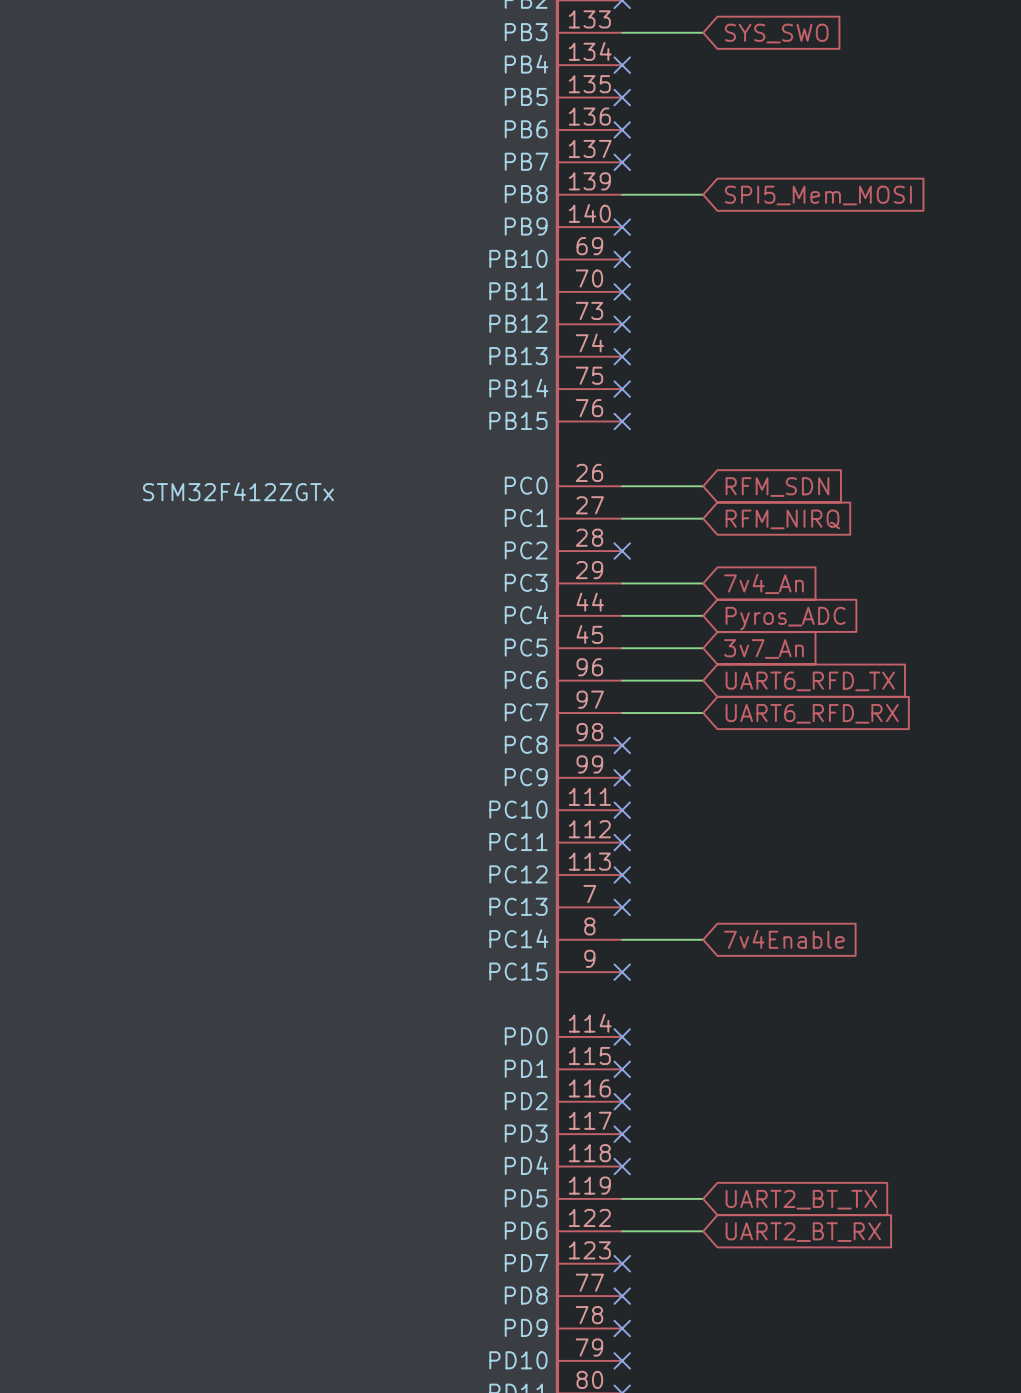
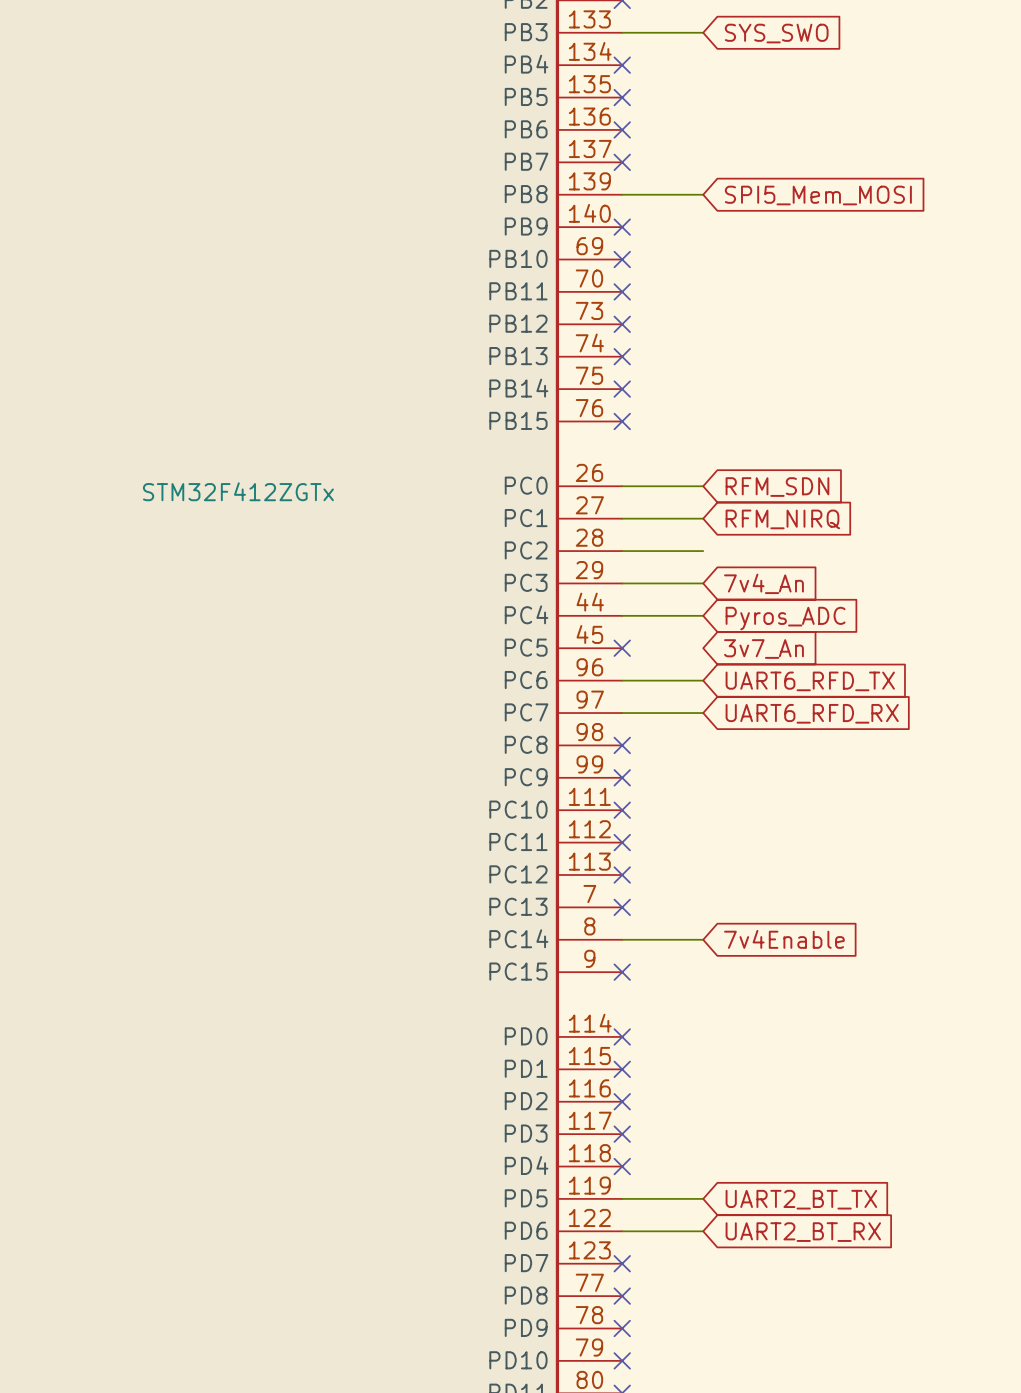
no-connect mark: (622, 551) -> none
wire: (622, 648) (703, 648) -> (622, 551) (703, 551)
no-connect mark: none -> (622, 648)

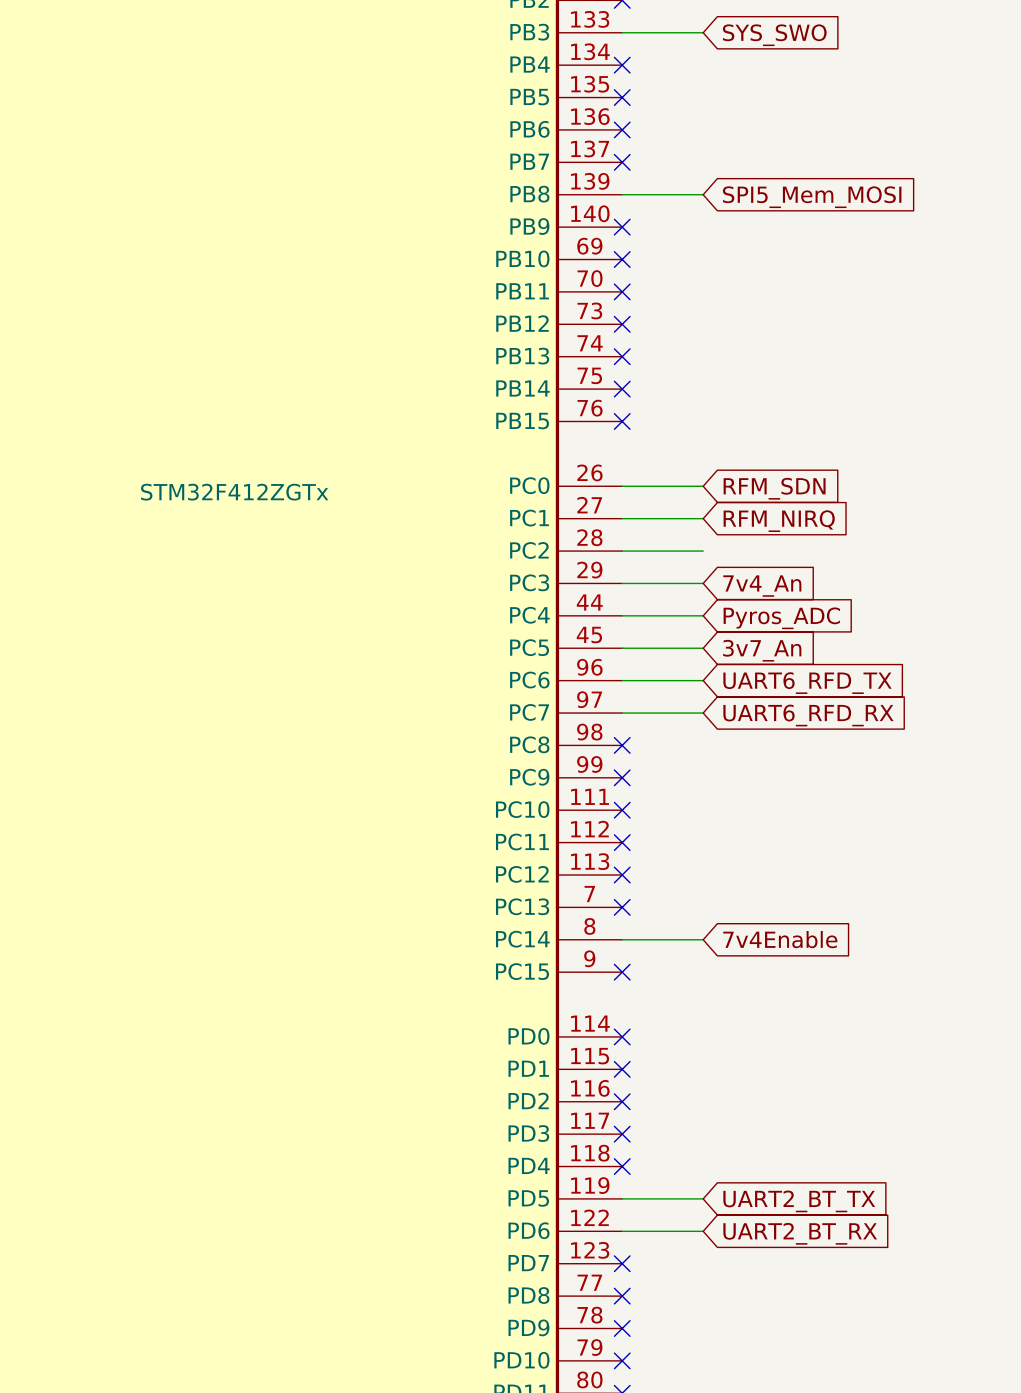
wire: none -> (622, 648) (703, 648)
no-connect mark: (622, 648) -> none

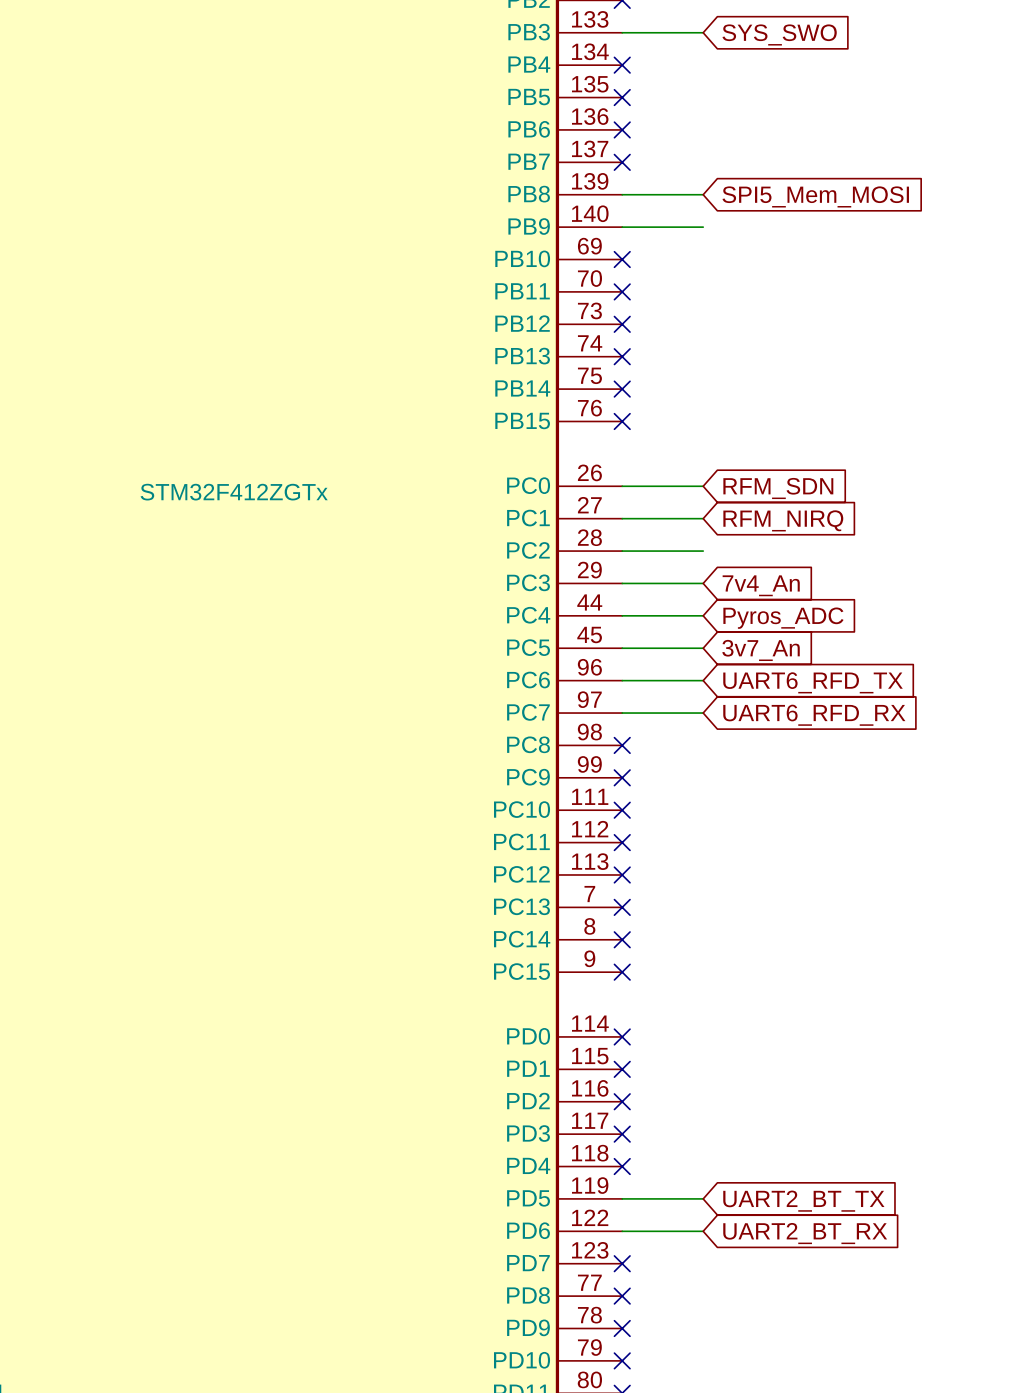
wire: none -> (622, 227) (703, 227)
no-connect mark: (622, 227) -> none
wire: (622, 939) (703, 939) -> none
no-connect mark: none -> (622, 939)
global label: 7v4Enable (780, 939) -> none

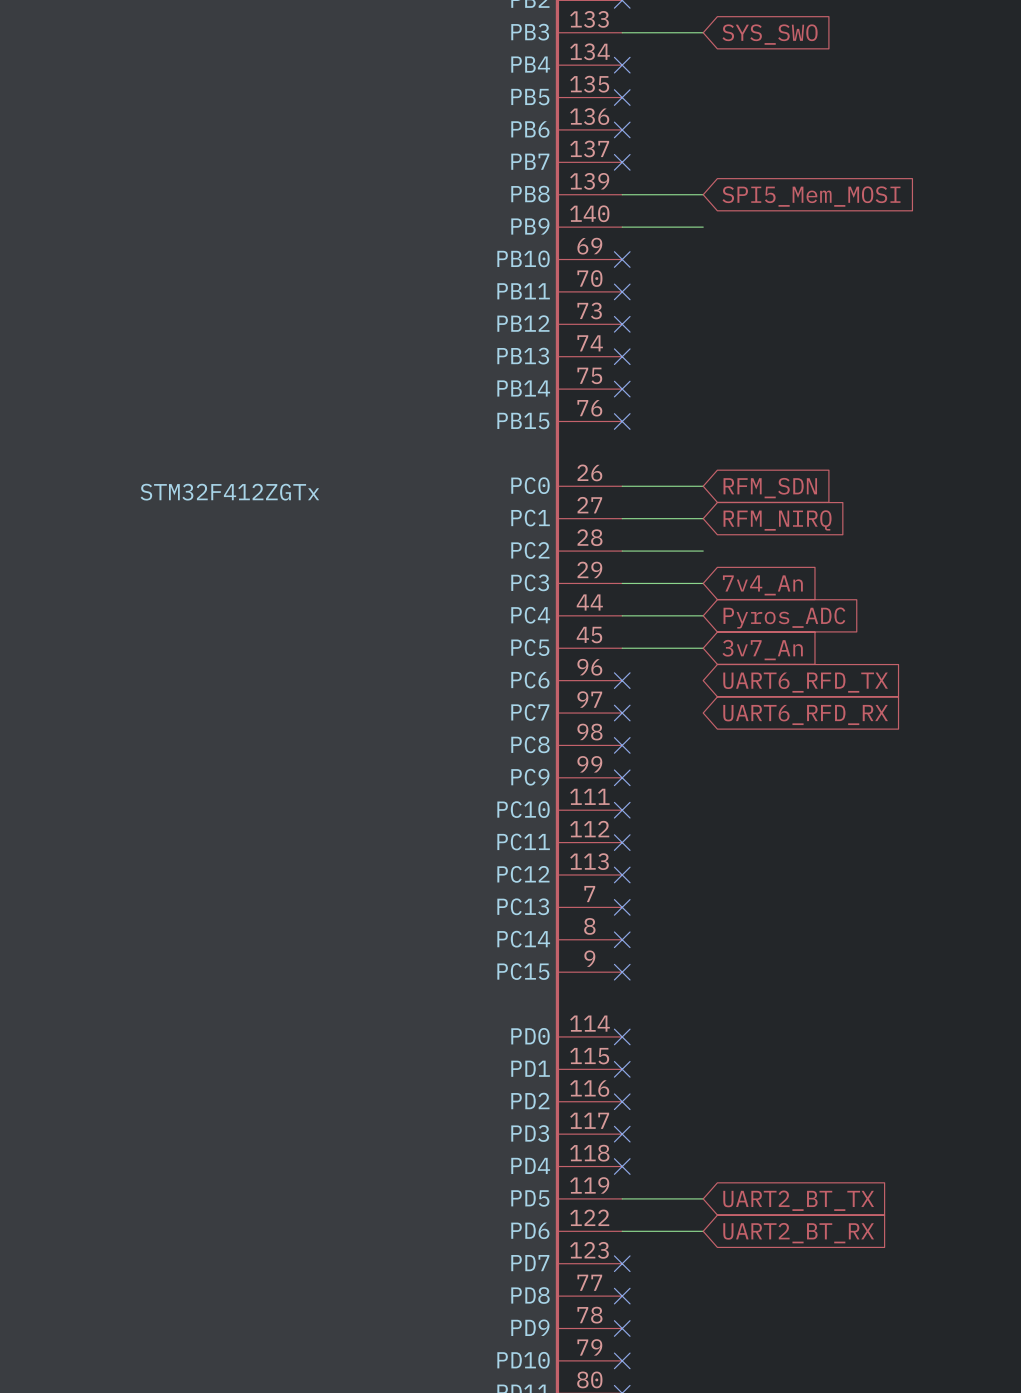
wire: (622, 680) (703, 680) -> none
no-connect mark: none -> (622, 680)
wire: (622, 713) (703, 713) -> none
no-connect mark: none -> (622, 713)

